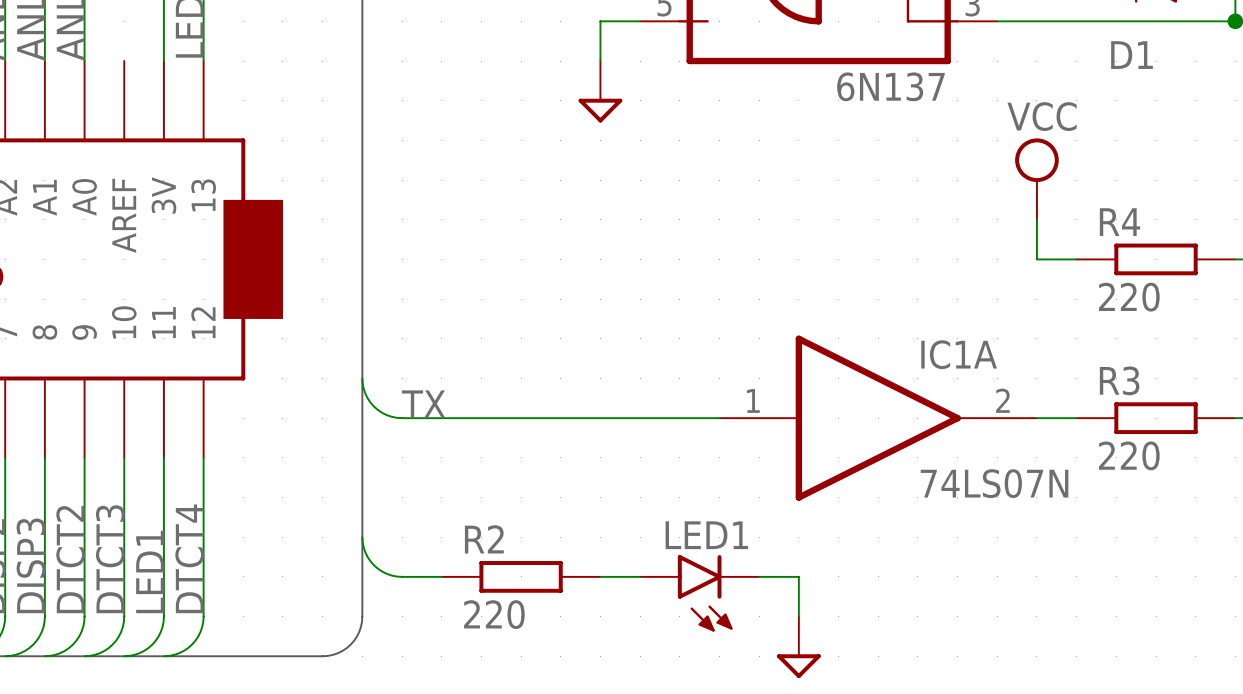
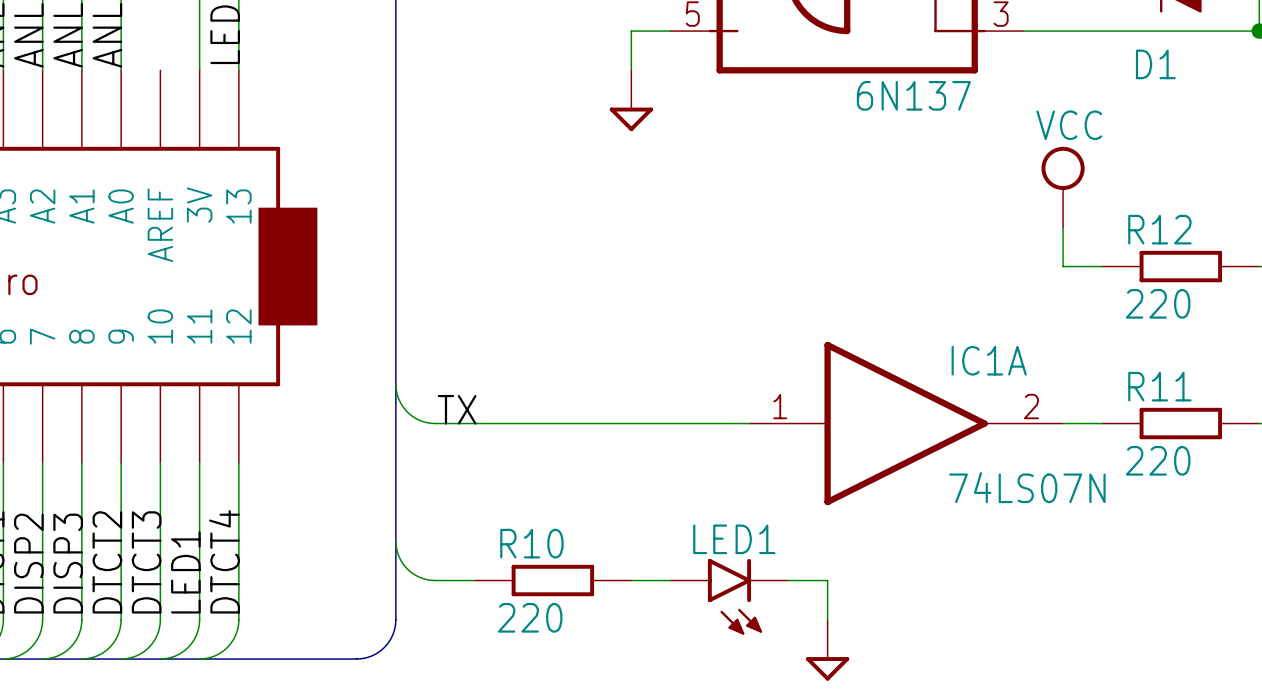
R4 name: R4 (1120, 222) -> R12 (1159, 229)
R3 name: R3 (1119, 380) -> R11 (1159, 386)
R2 name: R2 (484, 539) -> R10 (531, 543)

